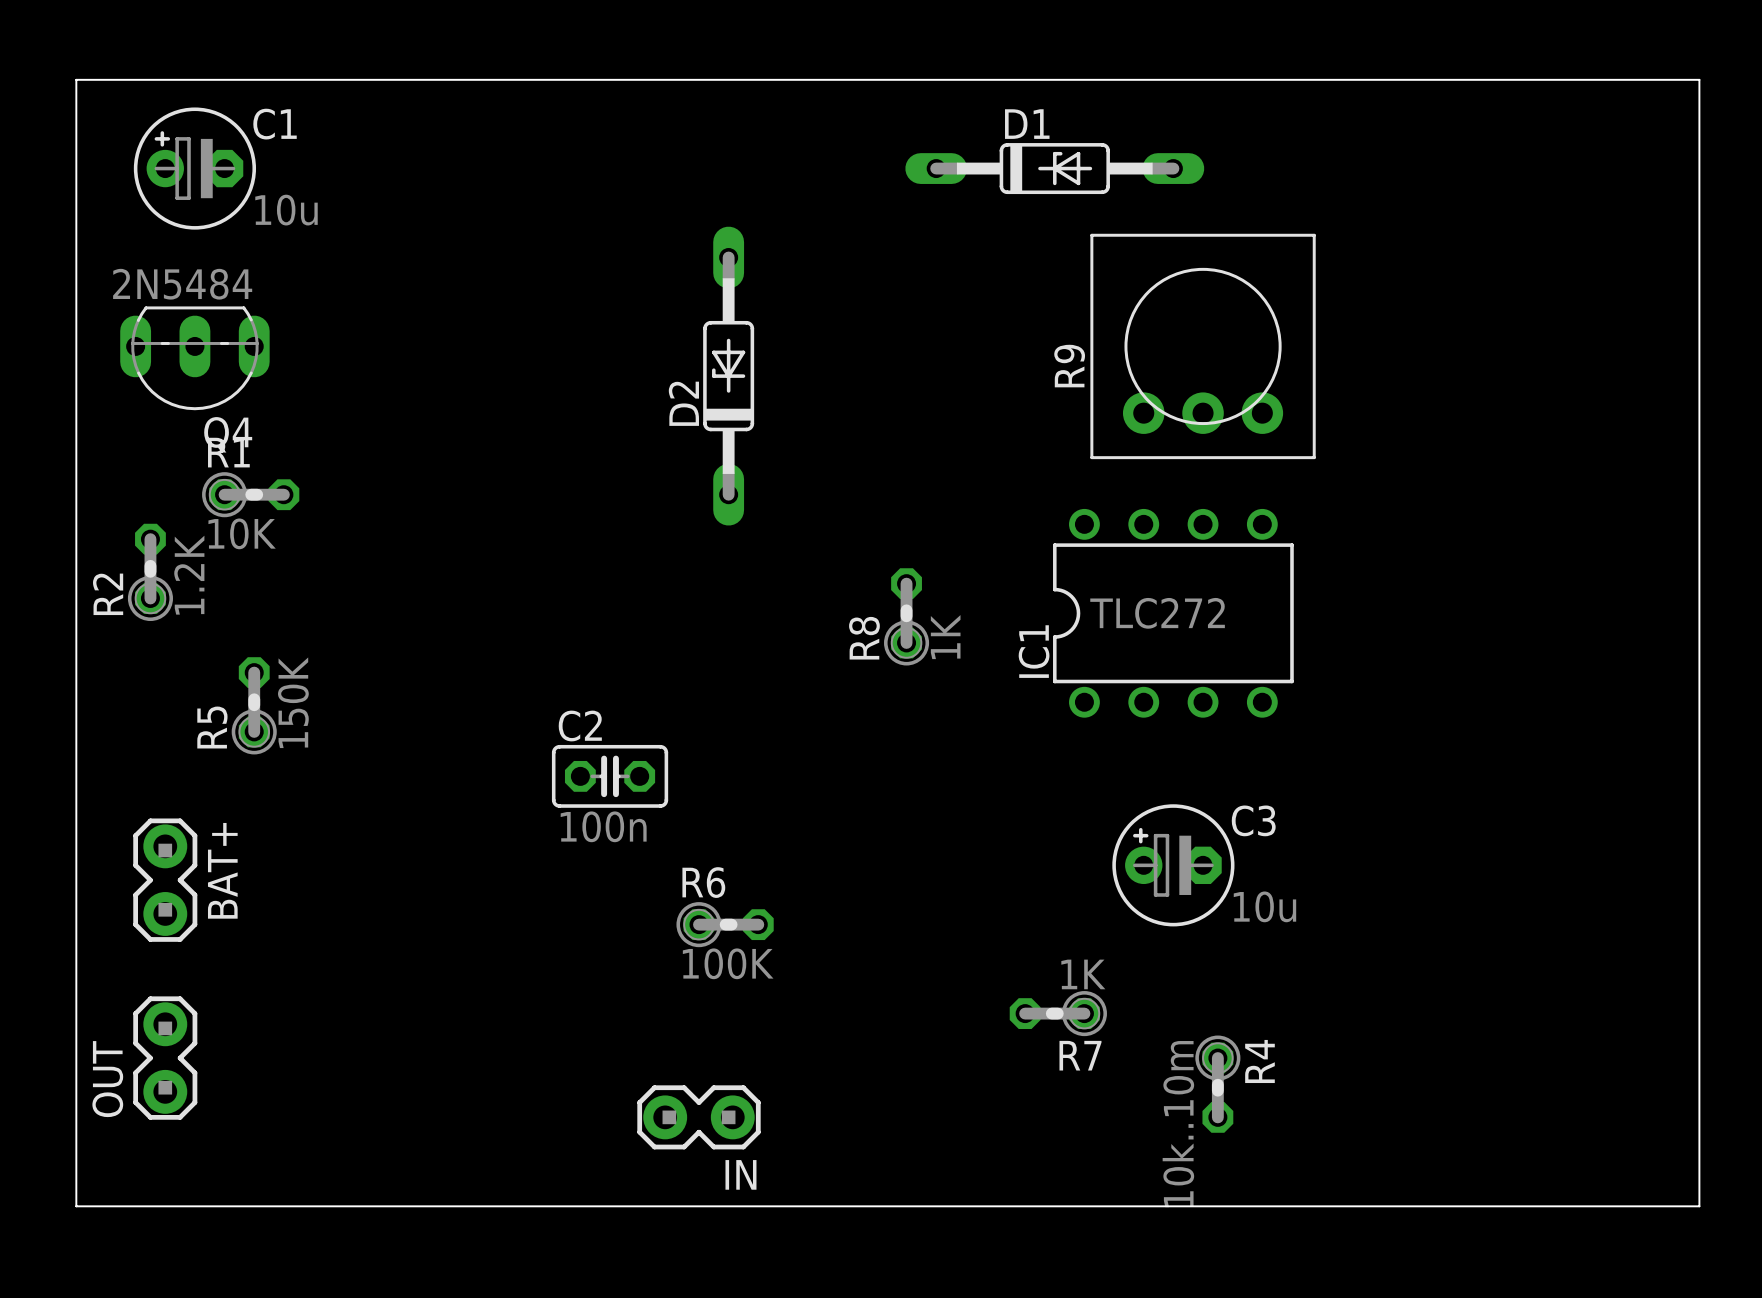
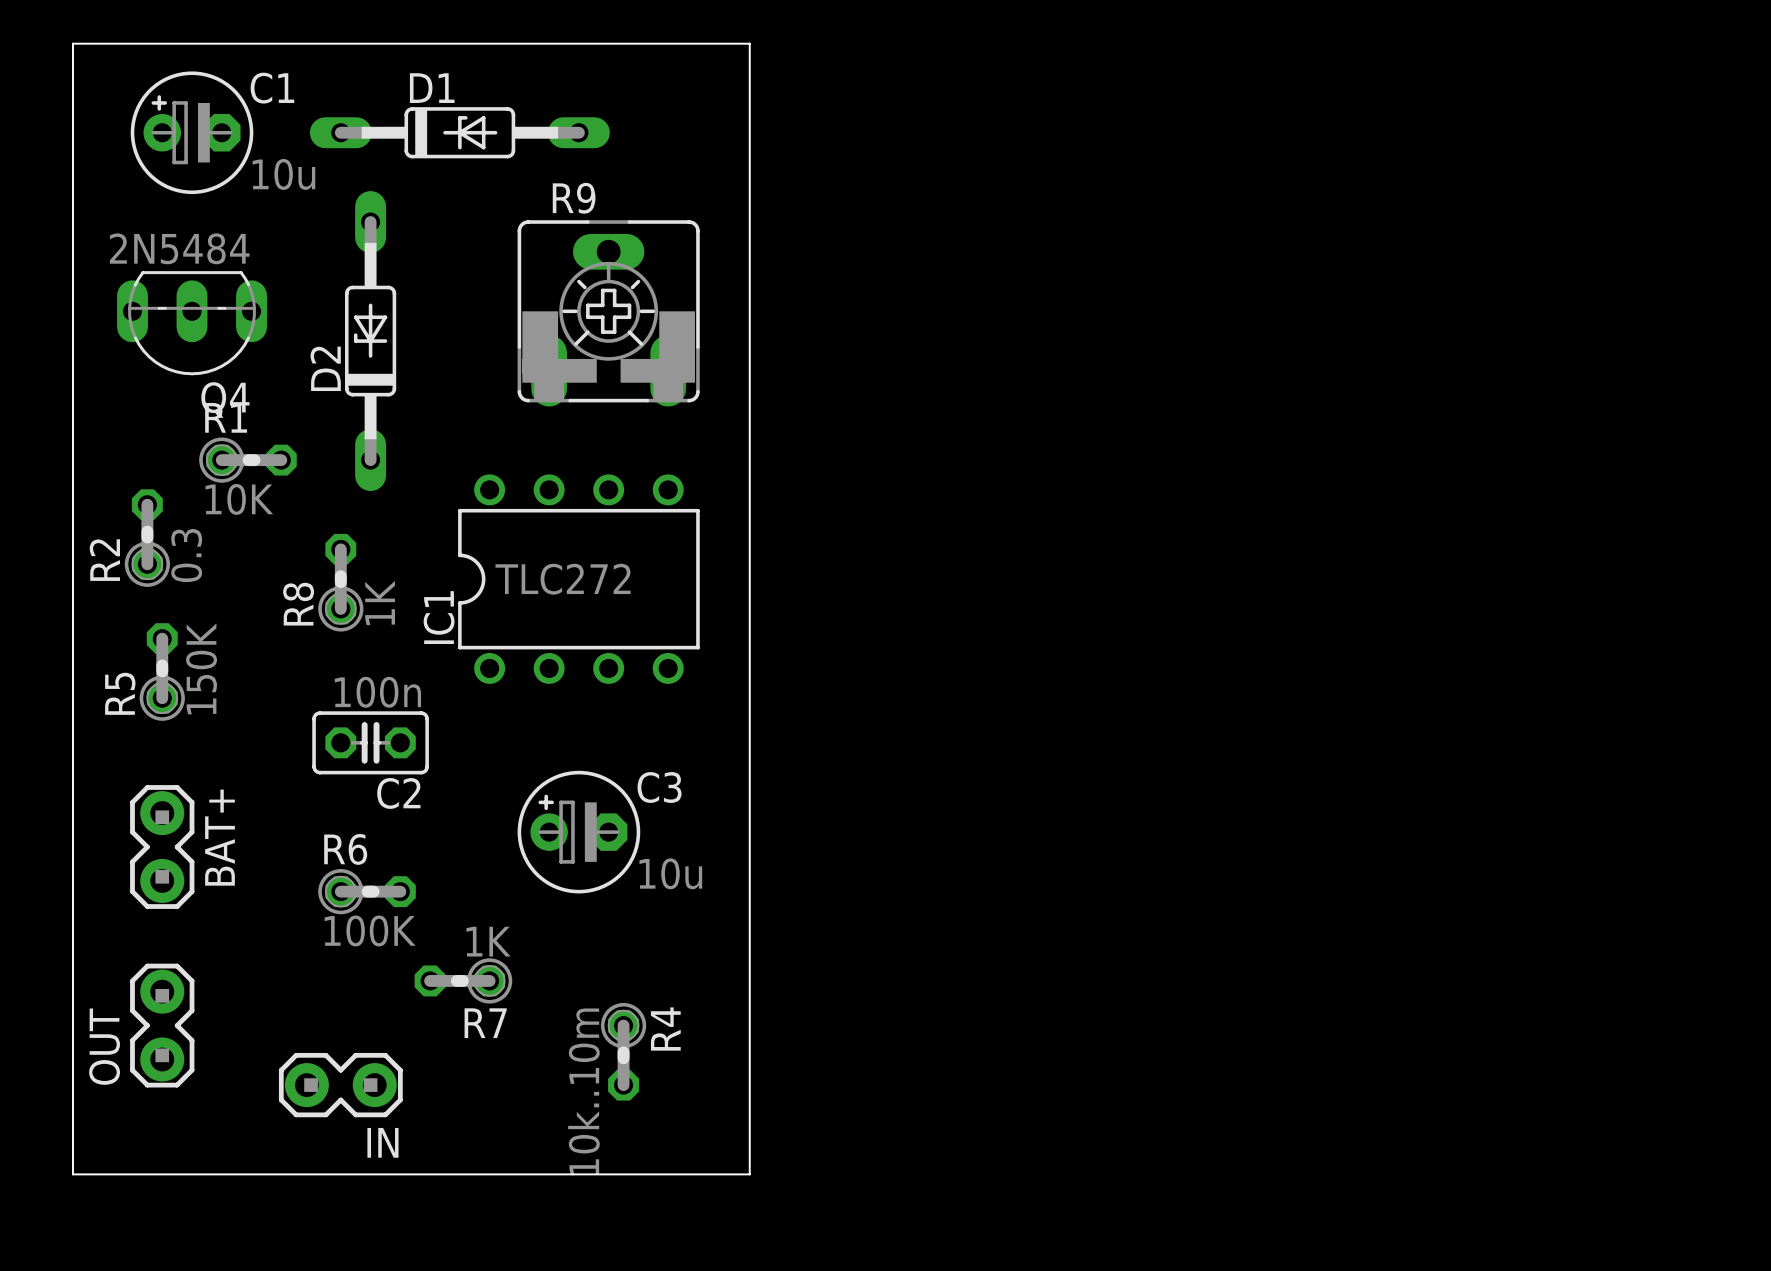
board edge: (750, 79) (1699, 79) (1699, 1206) (750, 1206) -> (749, 43) (749, 1174)
D1 position: (1054, 168) -> (459, 132)
R9 footprint: [1090, 233, 1316, 460] -> [517, 220, 700, 407]
R9 name position: R9 (1069, 366) -> R9 (574, 198)
D2 position: (728, 376) -> (370, 341)
R2 value: 1.2K (189, 575) -> 0.3 (186, 555)
IC1 position: (1173, 613) -> (578, 579)
R8 position: (906, 616) -> (340, 582)
R5 position: (254, 705) -> (162, 672)
C2 name position: C2 (580, 726) -> C2 (398, 793)
C2 position: (610, 776) -> (370, 742)
C2 value position: 100n (603, 826) -> 100n (377, 692)
C3 position: (1173, 865) -> (578, 832)
R6 position: (725, 924) -> (367, 891)
R7 position: (1058, 1013) -> (463, 980)
R4 position: (1217, 1084) -> (623, 1051)
IN position: (698, 1117) -> (340, 1085)

